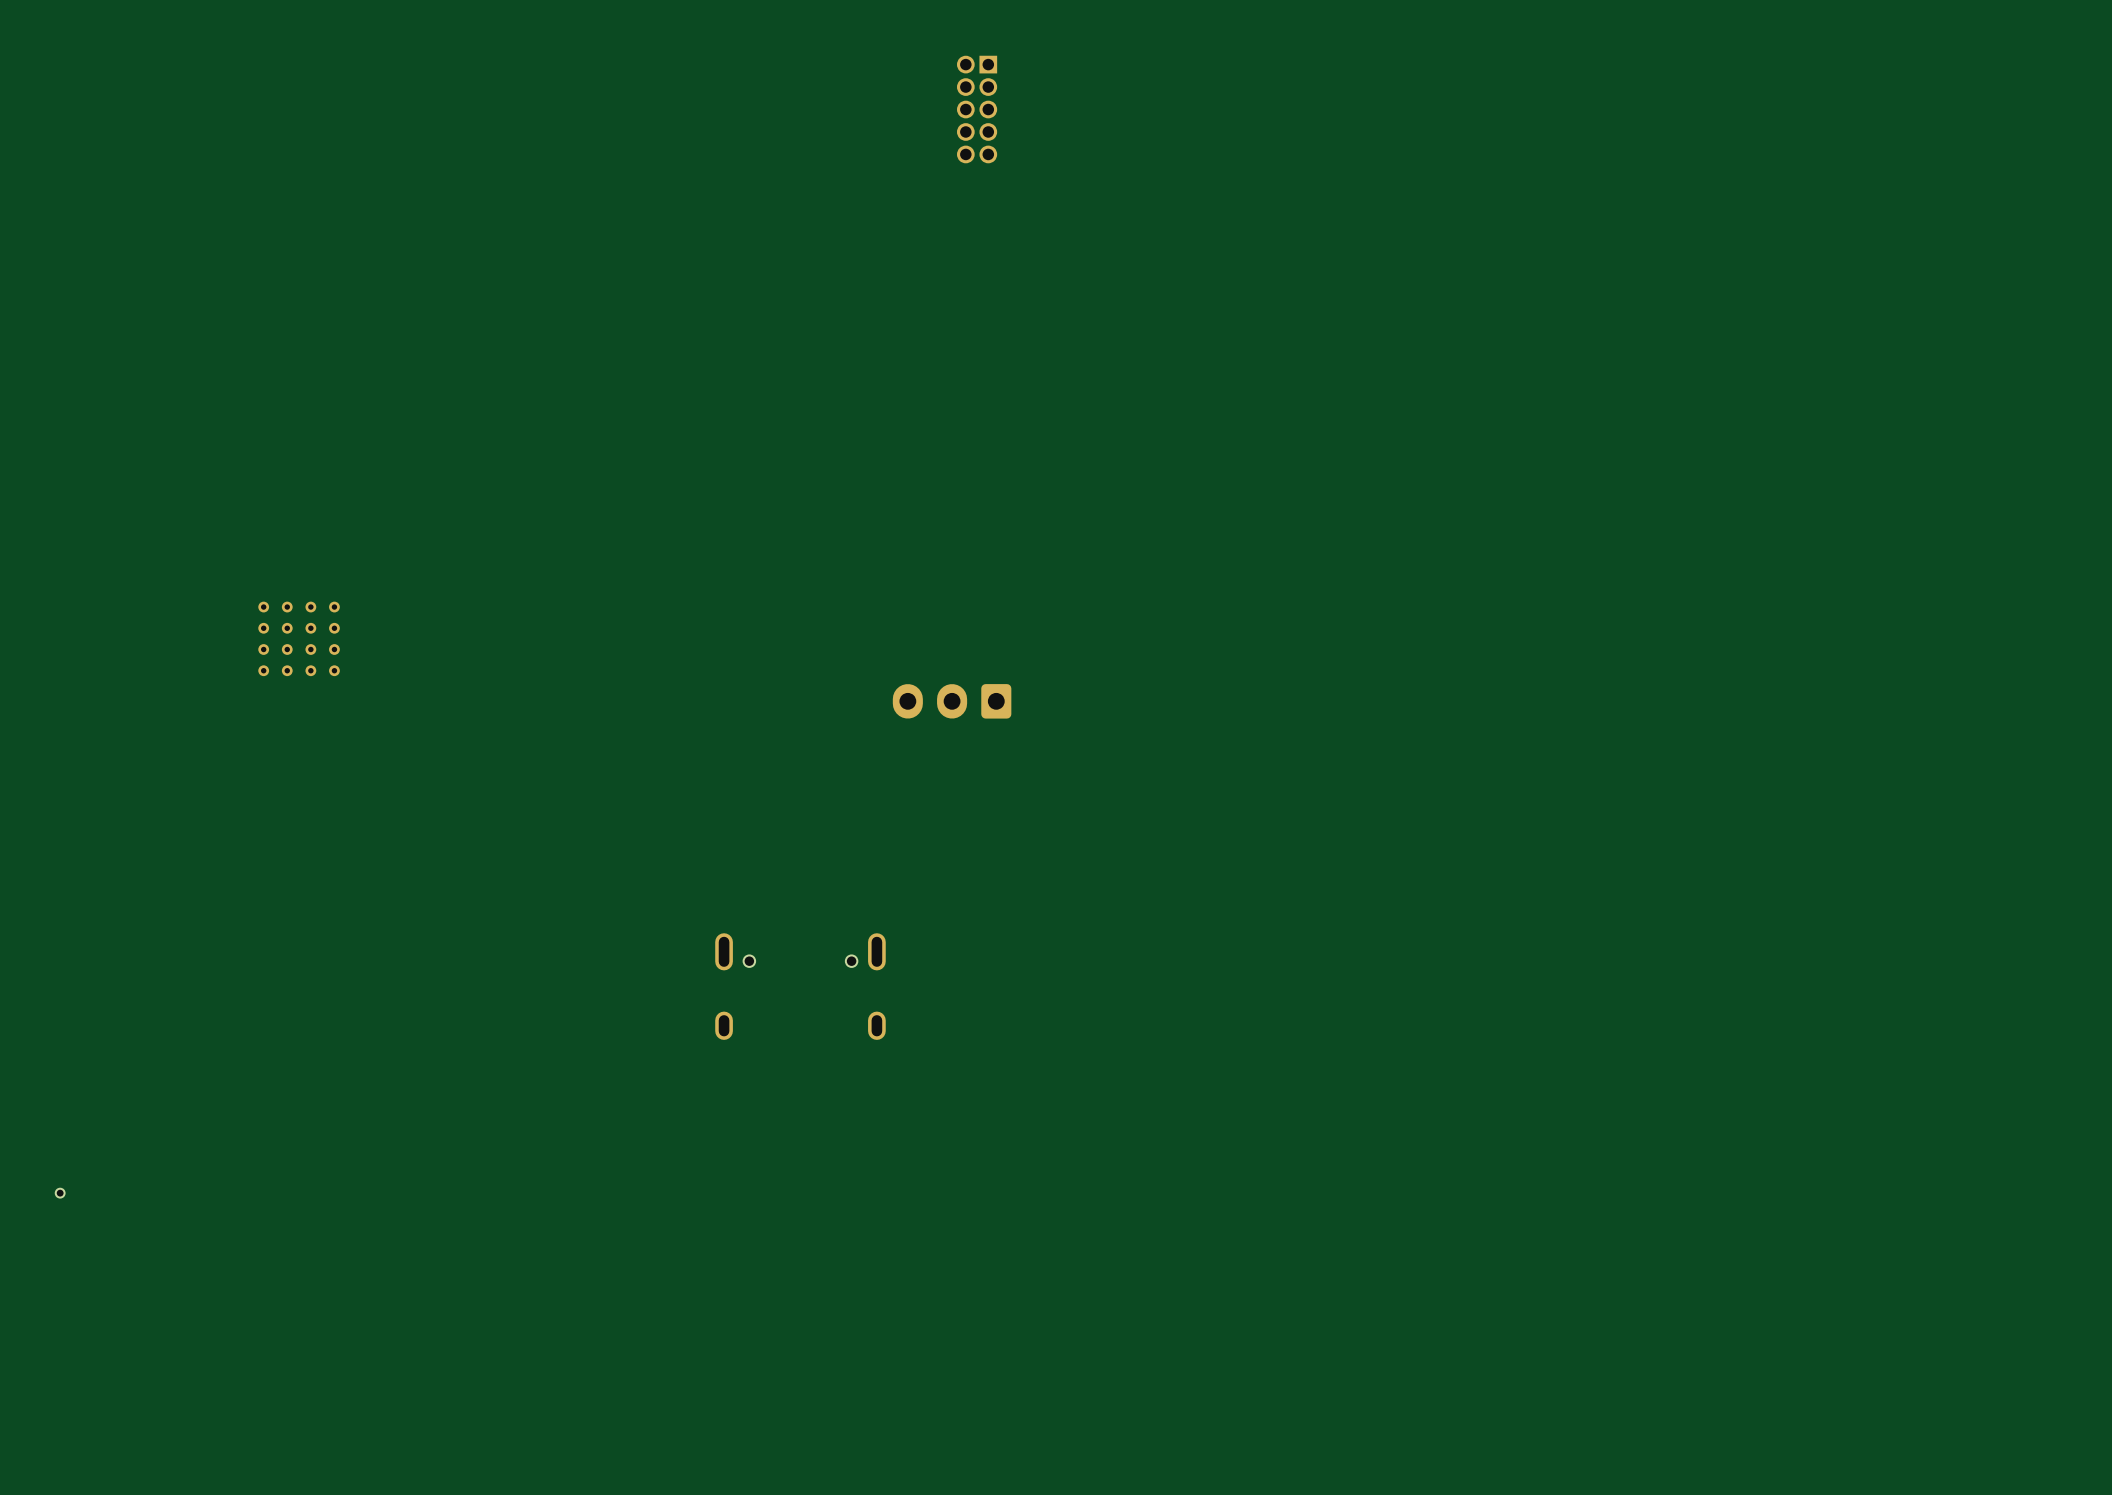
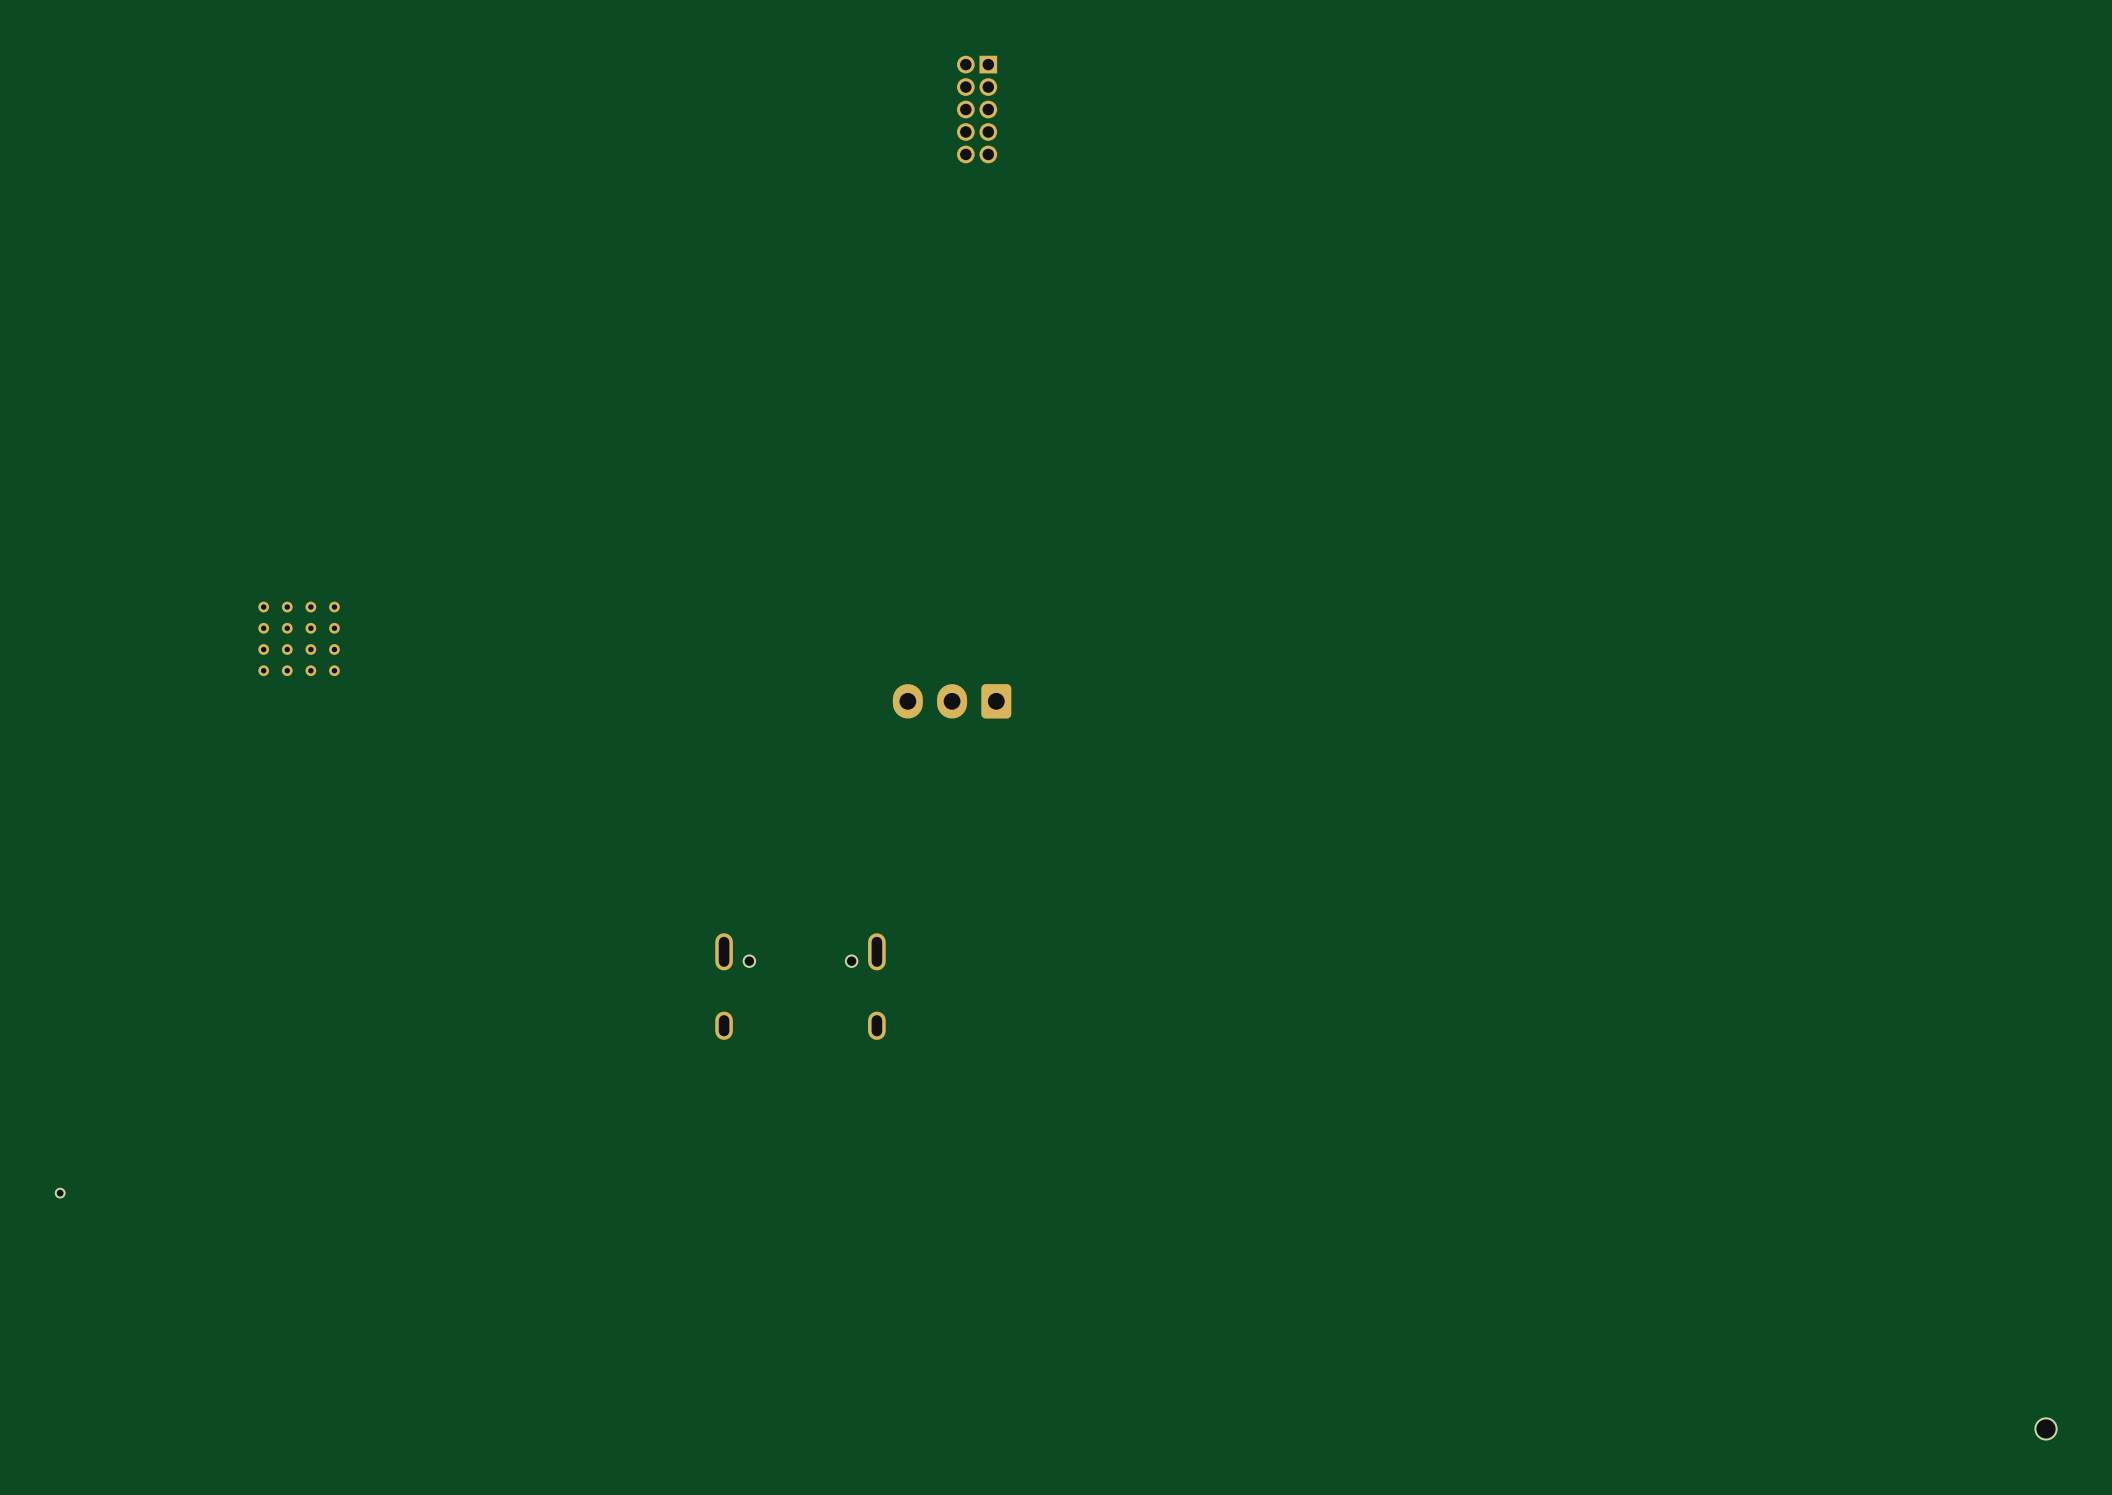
part: none -> (2046, 1428)

